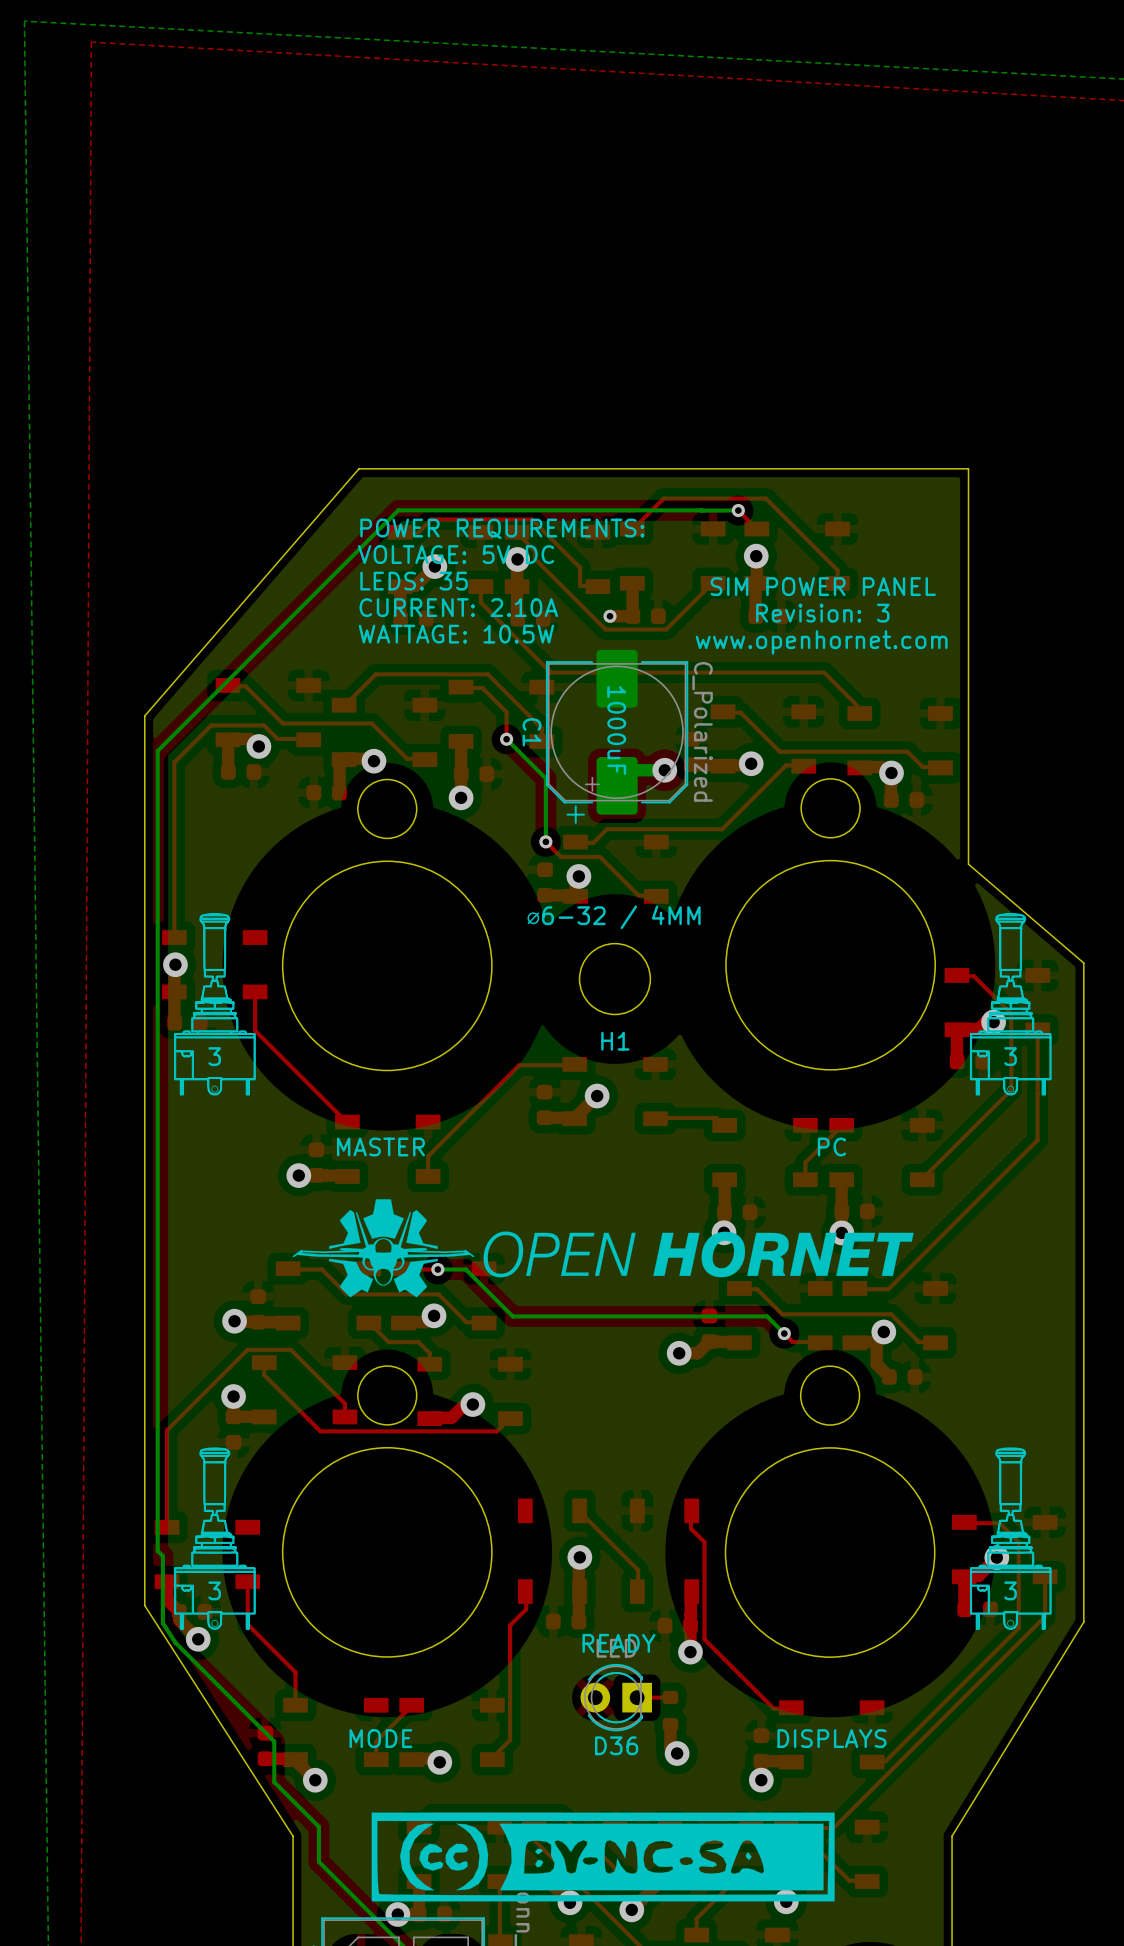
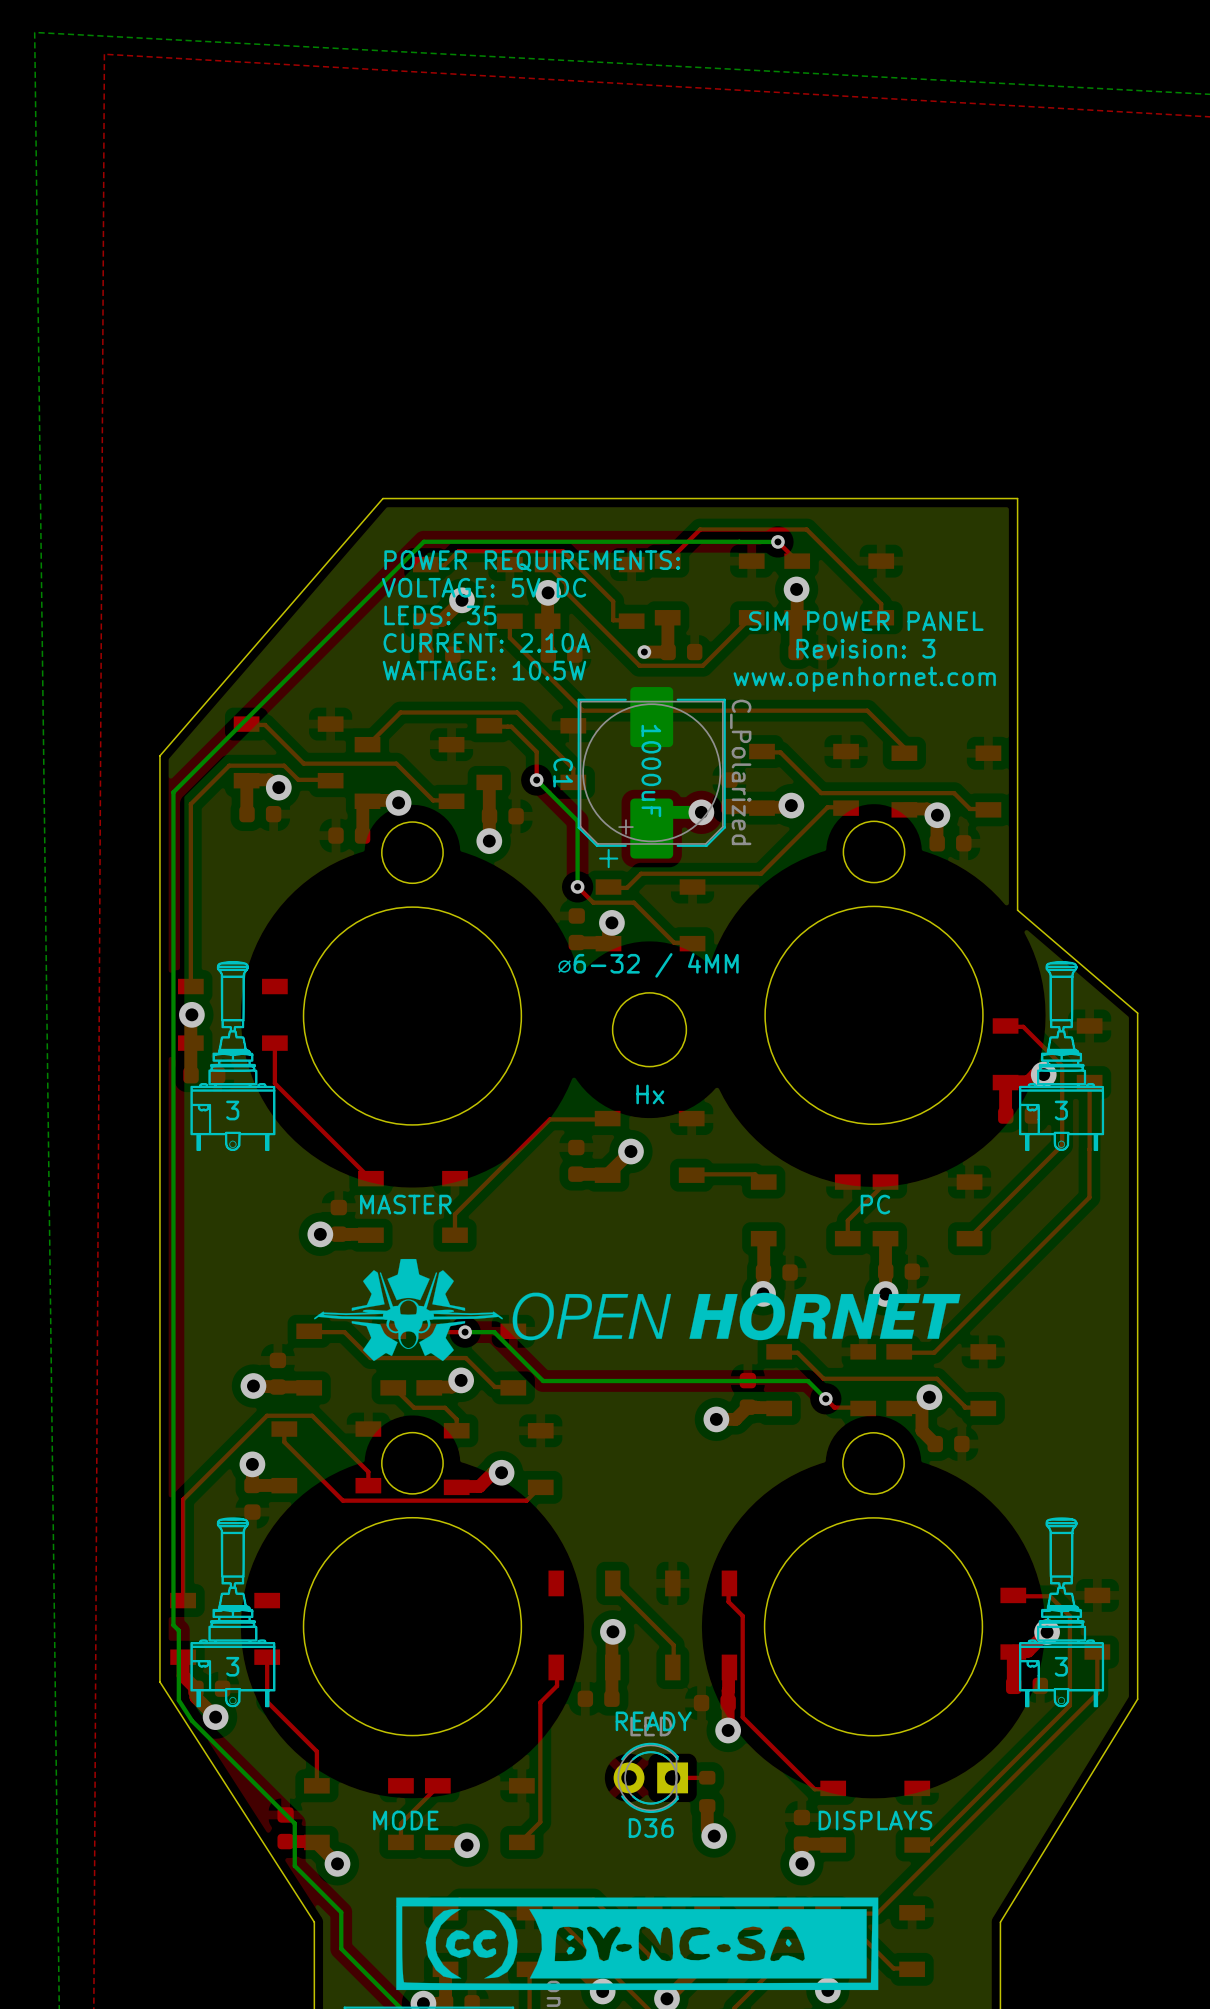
part text: H1 (615, 1041) -> Hx (650, 1094)

